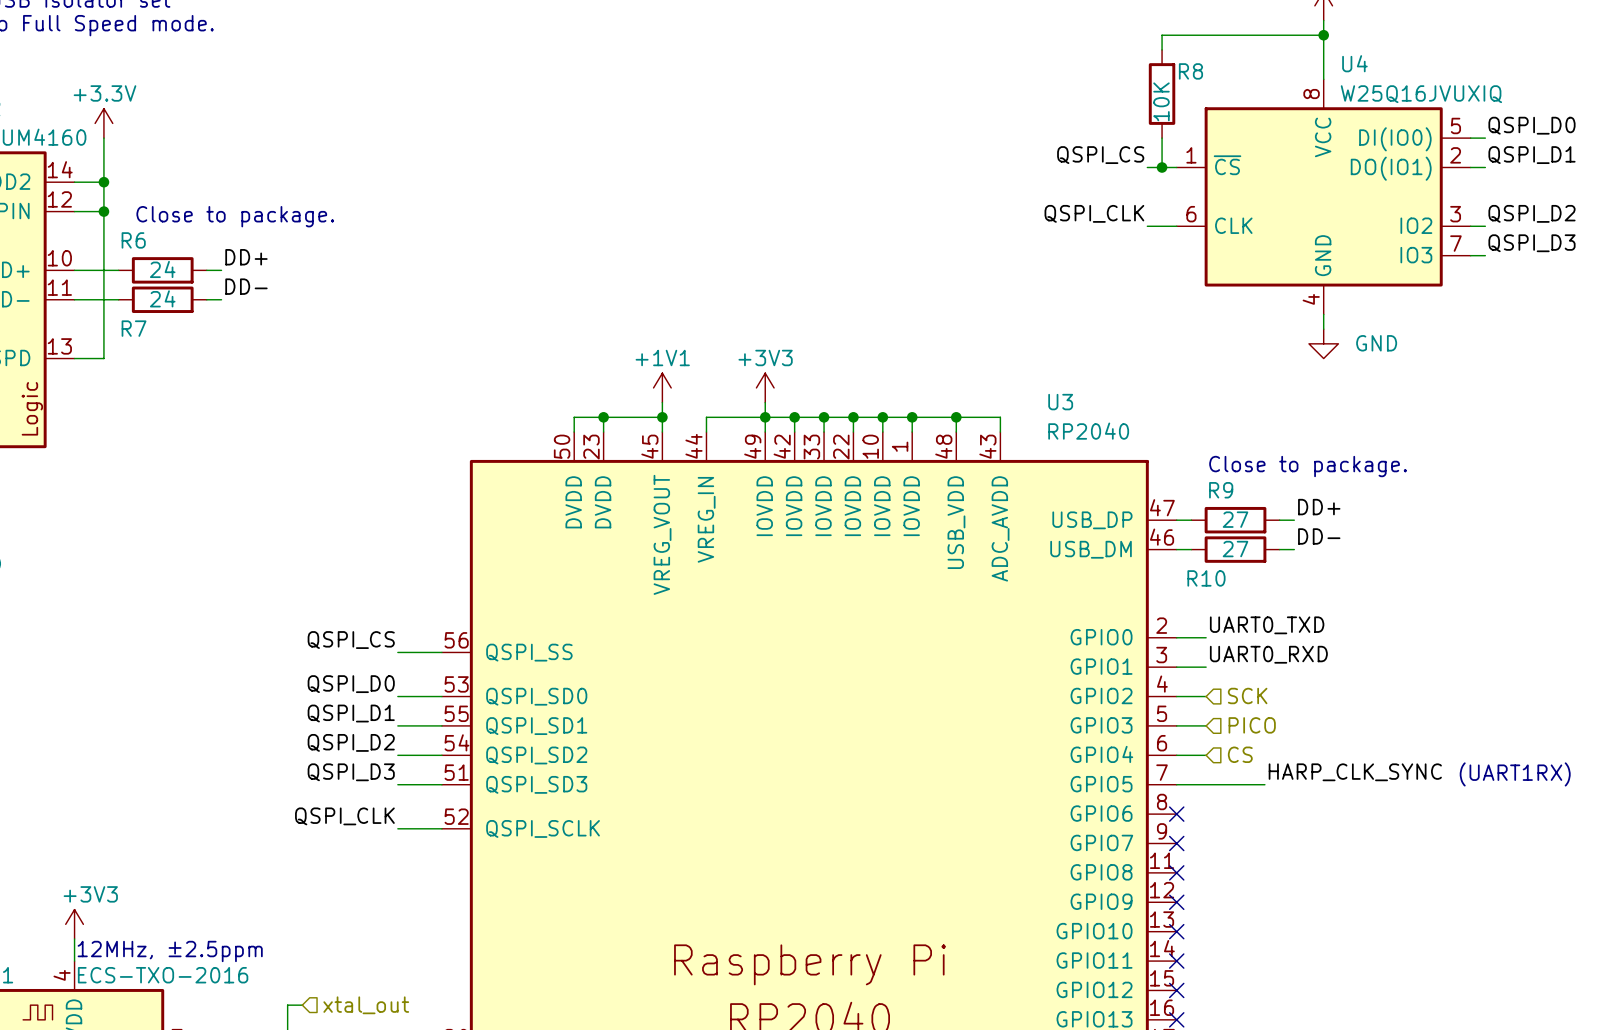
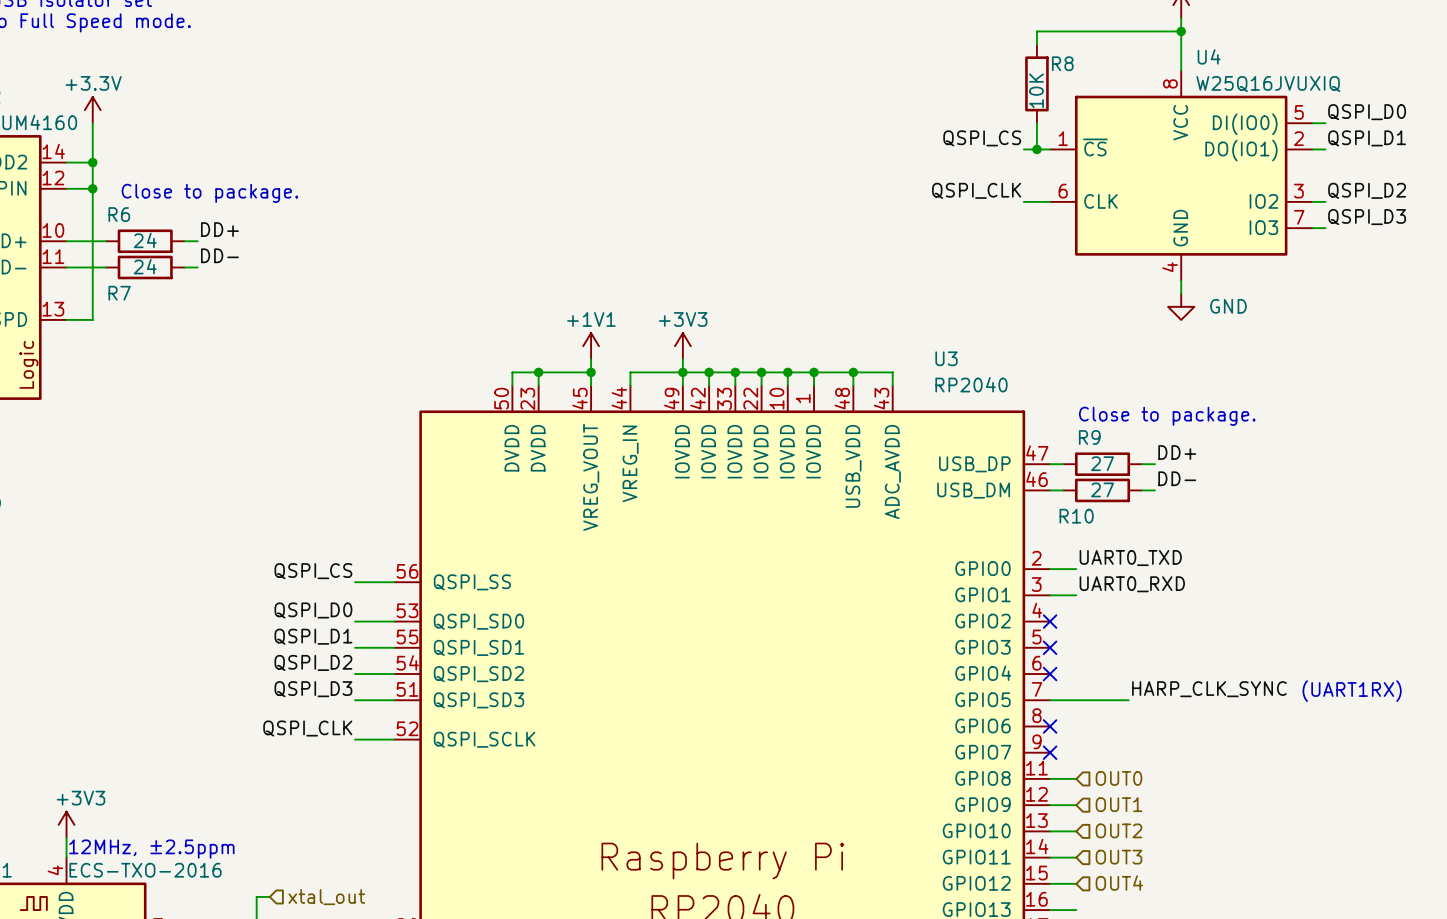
hierarchical label: SCK (1247, 695) -> none
wire: (1176, 696) (1206, 696) -> (1050, 778) (1076, 778)
no-connect mark: none -> (1050, 621)
wire: (1176, 725) (1206, 725) -> (1050, 805) (1076, 805)
no-connect mark: none -> (1050, 647)
hierarchical label: PICO (1252, 725) -> none
hierarchical label: CS (1240, 754) -> none
wire: (1176, 755) (1206, 755) -> (1050, 831) (1076, 831)
no-connect mark: none -> (1050, 674)
no-connect mark: (1176, 872) -> none
hierarchical label: none -> OUT0 (1118, 778)
hierarchical label: none -> OUT1 (1118, 804)
no-connect mark: (1176, 902) -> none
no-connect mark: (1176, 931) -> none
hierarchical label: none -> OUT2 (1118, 830)
hierarchical label: none -> OUT3 (1118, 857)
wire: none -> (1050, 857) (1076, 857)
no-connect mark: (1176, 961) -> none
hierarchical label: none -> OUT4 (1119, 883)
wire: none -> (1050, 883) (1076, 883)
no-connect mark: (1176, 990) -> none
wire: none -> (1050, 910) (1076, 910)
no-connect mark: (1176, 1019) -> none

